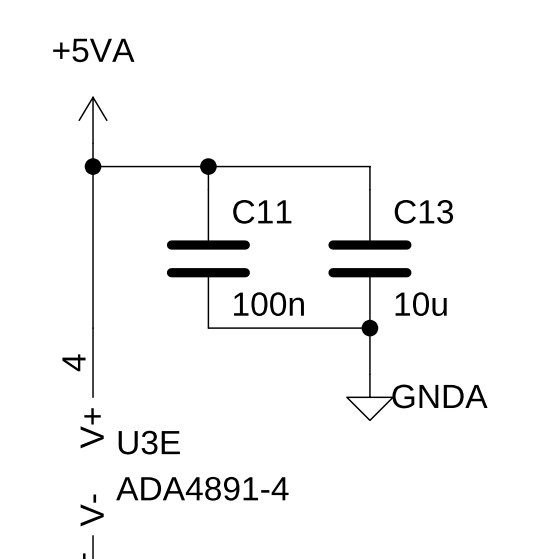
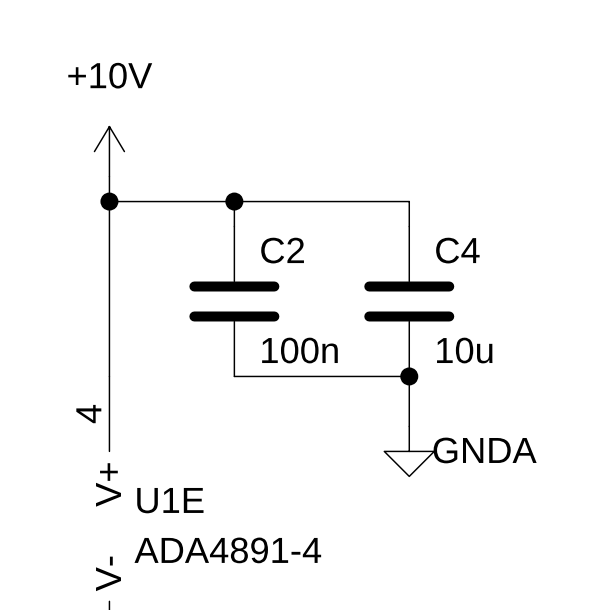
power symbol: +5VA (93, 120) -> +10V (109, 151)
C11 name: C11 (262, 211) -> C2 (282, 250)
C13 name: C13 (423, 211) -> C4 (457, 250)
U3E name: U3E (149, 442) -> U1E (170, 500)

